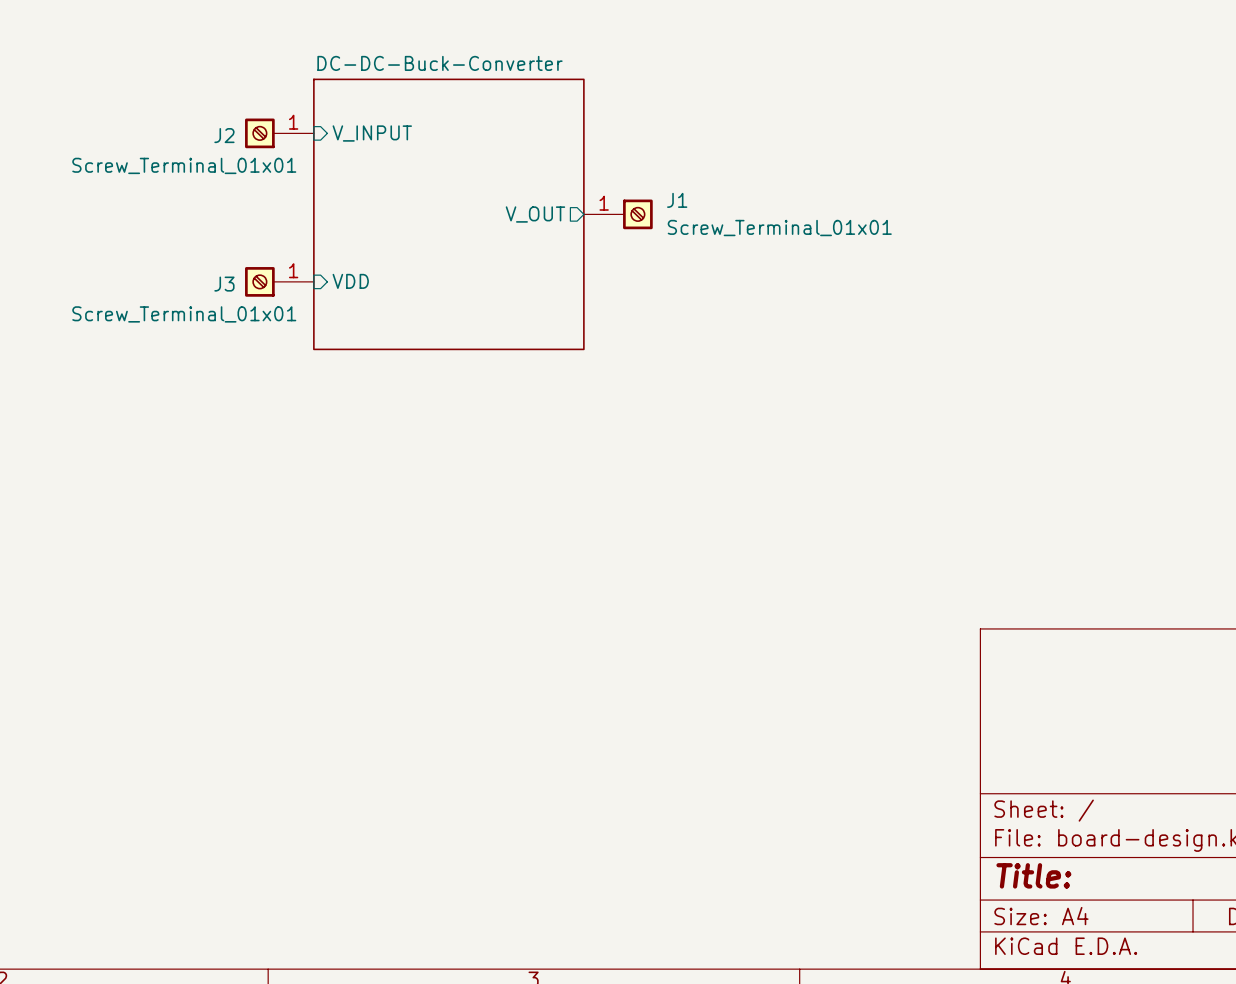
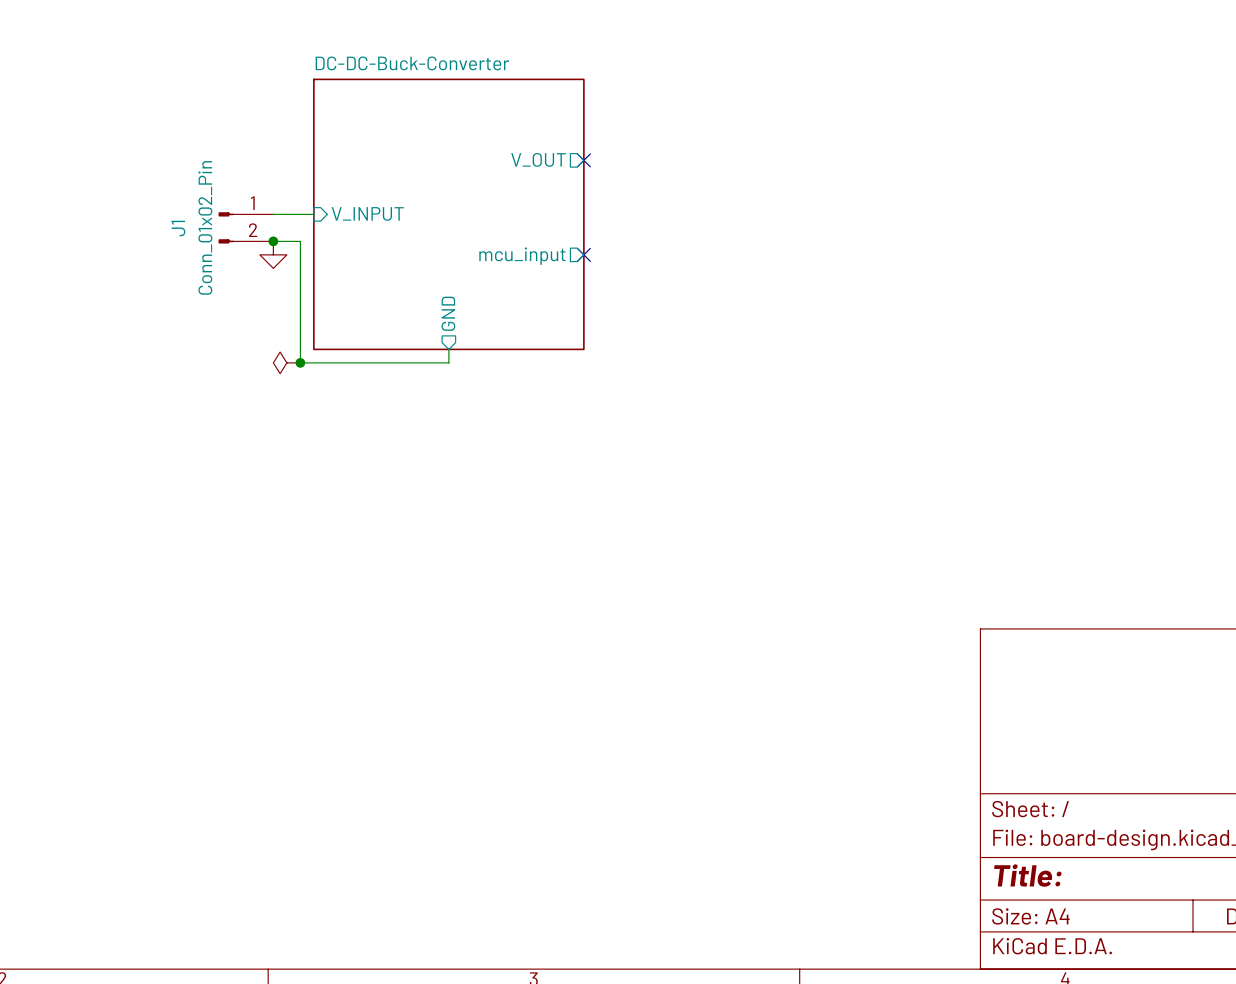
J2: Screw_Terminal_01x01 (279, 133) -> none
sheet pin position: V_INPUT (372, 133) -> V_INPUT (367, 213)
no-connect mark: none -> (583, 160)
J1 symbol: [583, 199, 653, 230] -> [218, 212, 274, 244]
J1 name position: J1 (677, 200) -> J1 (178, 228)
wire: none -> (273, 214) (313, 214)
sheet pin position: V_OUT (535, 214) -> V_OUT (538, 159)
J1 value: Screw_Terminal_01x01 (779, 228) -> Conn_01x02_Pin (205, 227)
wire: none -> (273, 241) (300, 241) (300, 362) (448, 362) (448, 349)
junction: none -> (273, 241)
power symbol: none -> (273, 254)
no-connect mark: none -> (583, 254)
sheet pin: none -> mcu_input (522, 256)
J3: Screw_Terminal_01x01 (279, 281) -> none
sheet pin: VDD (350, 281) -> none
sheet pin: none -> GND (448, 313)
power symbol: none -> (286, 362)
junction: none -> (300, 362)

